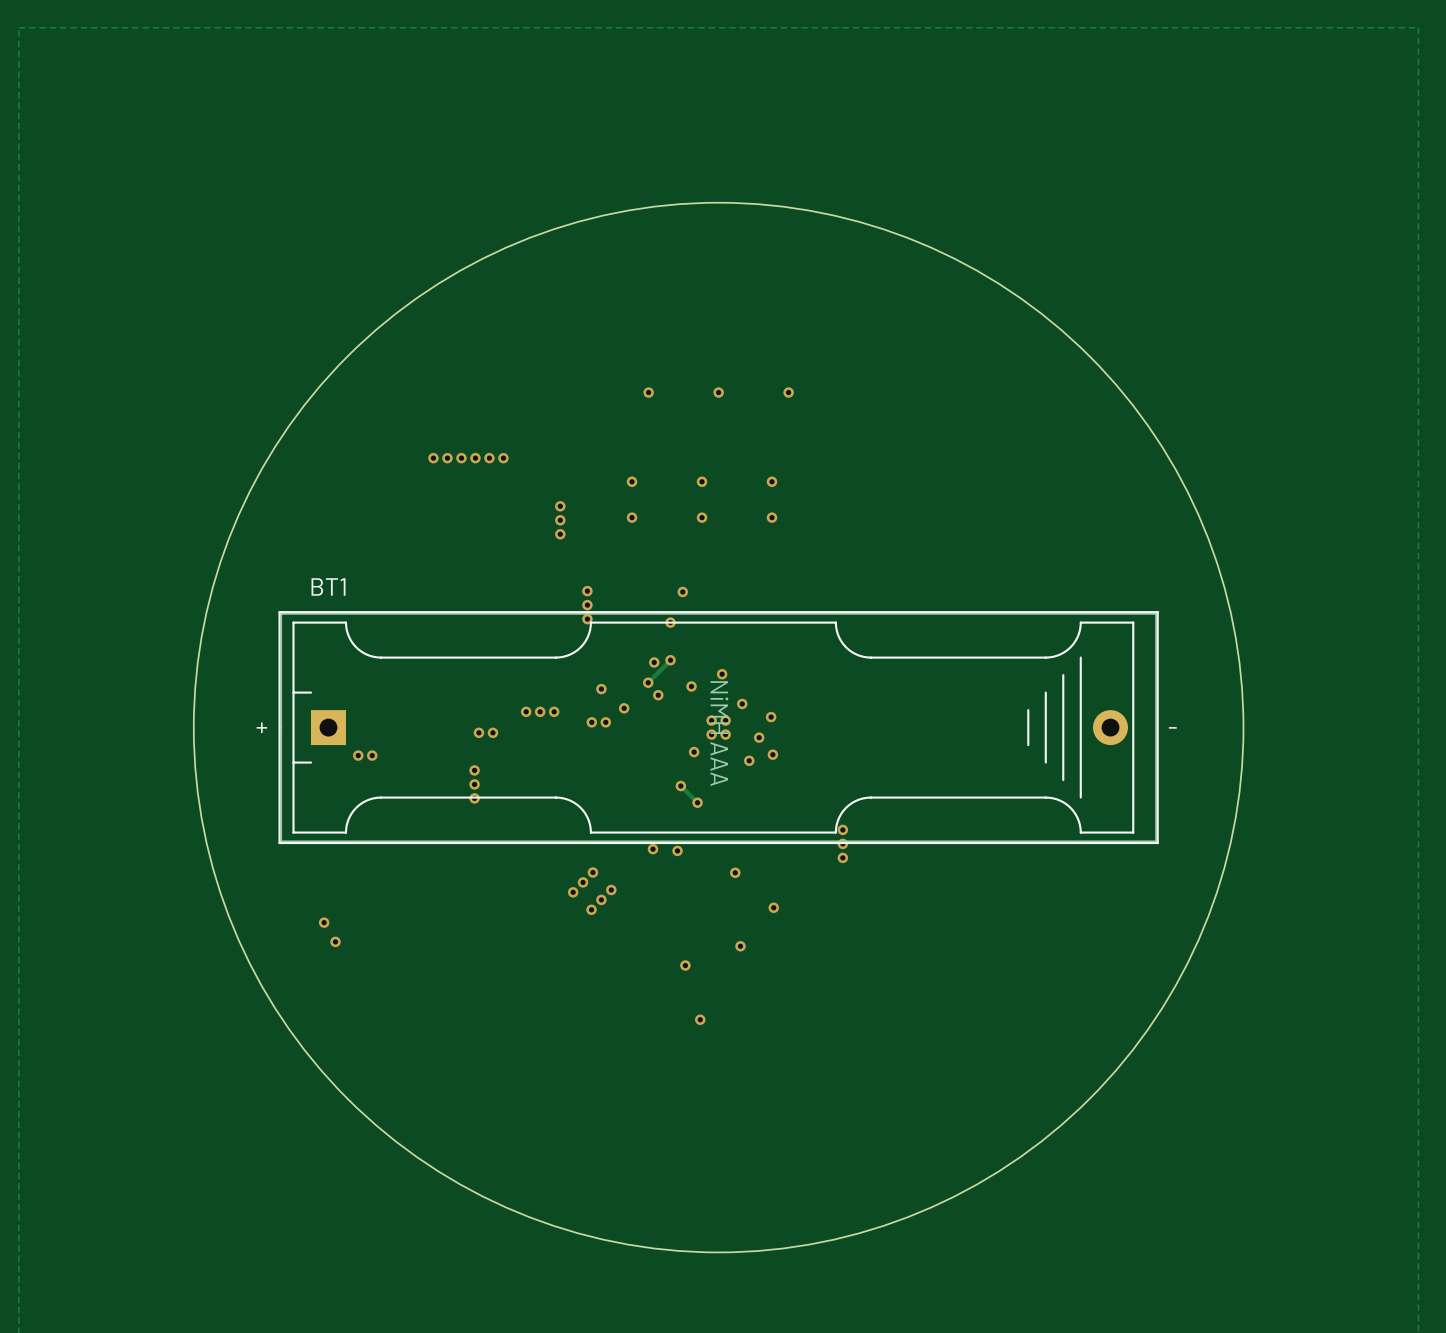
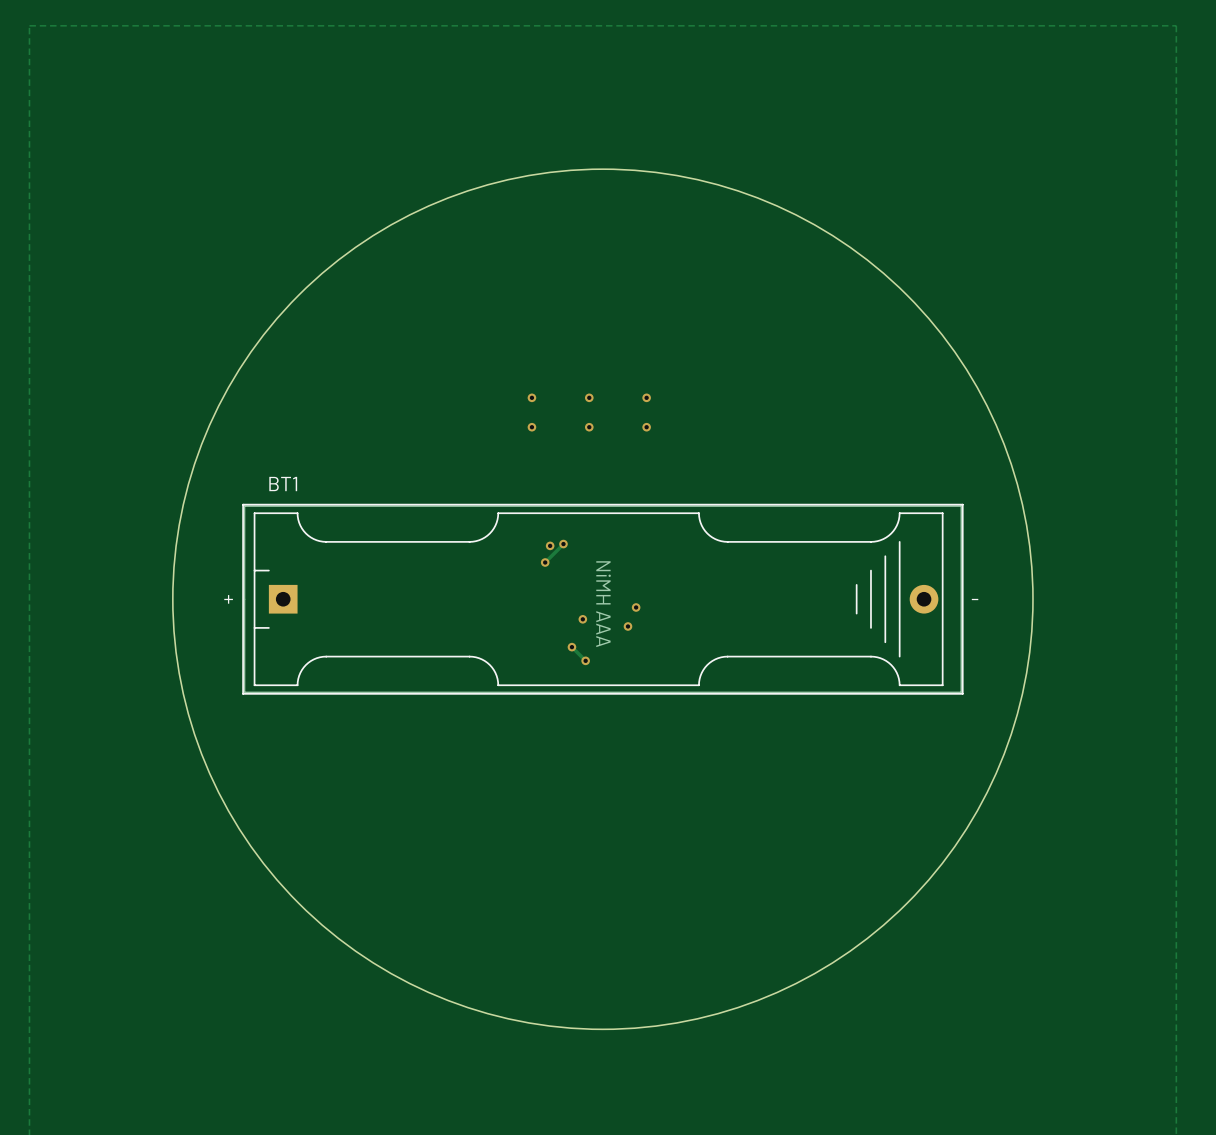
via: (648, 392) -> none
via: (718, 392) -> none
via: (788, 392) -> none
via: (433, 458) -> none
via: (447, 458) -> none
via: (461, 458) -> none
via: (475, 458) -> none
via: (489, 458) -> none
via: (503, 458) -> none
via: (560, 506) -> none
via: (560, 520) -> none
via: (560, 534) -> none
via: (587, 591) -> none
via: (682, 591) -> none
via: (587, 605) -> none
via: (587, 619) -> none
via: (670, 622) -> none
via: (722, 674) -> none
via: (691, 686) -> none
via: (601, 689) -> none
via: (658, 695) -> none
via: (742, 703) -> none
via: (624, 708) -> none
via: (526, 711) -> none
via: (540, 711) -> none
via: (554, 711) -> none
via: (771, 717) -> none
via: (711, 720) -> none
via: (725, 720) -> none
via: (591, 722) -> none
via: (605, 722) -> none
via: (478, 732) -> none
via: (492, 732) -> none
via: (711, 734) -> none
via: (725, 734) -> none
via: (772, 754) -> none
via: (358, 755) -> none
via: (372, 755) -> none
via: (474, 770) -> none
via: (474, 784) -> none
via: (474, 798) -> none
via: (842, 829) -> none
via: (842, 843) -> none
via: (653, 849) -> none
via: (677, 850) -> none
via: (842, 857) -> none
via: (592, 872) -> none
via: (735, 872) -> none
via: (583, 882) -> none
via: (611, 890) -> none
via: (573, 892) -> none
via: (601, 899) -> none
via: (773, 907) -> none
via: (591, 909) -> none
via: (324, 922) -> none
via: (335, 941) -> none
via: (740, 946) -> none
via: (685, 965) -> none
via: (700, 1019) -> none

